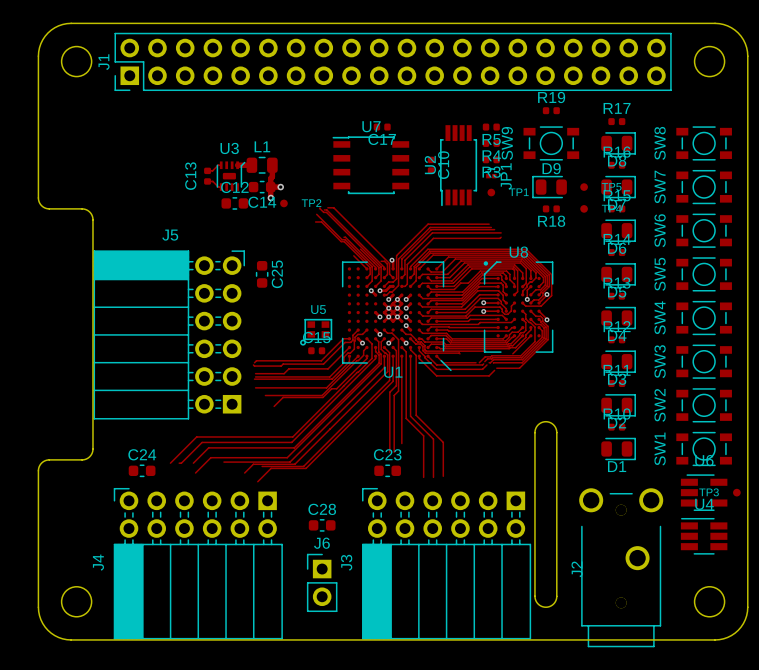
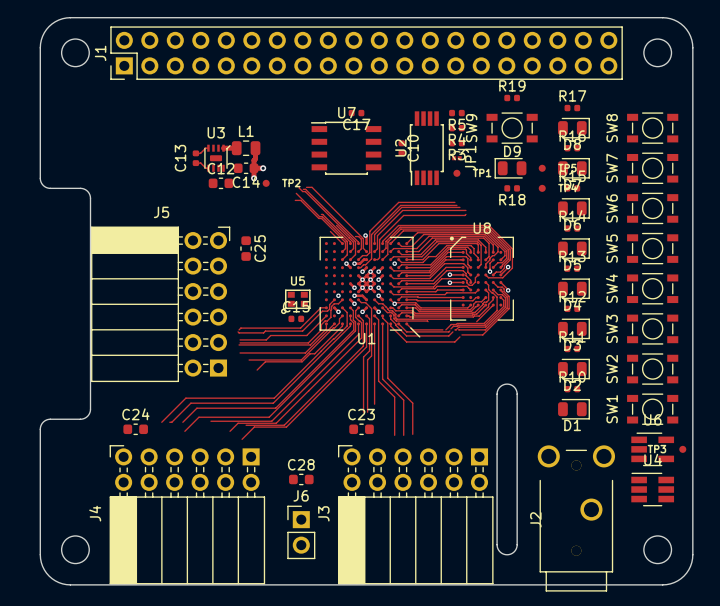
via: none -> (394, 263)
via: none -> (338, 295)
track: none -> (354, 295) (362, 295) (366, 299)
via: none -> (354, 295)
via: none -> (394, 303)

